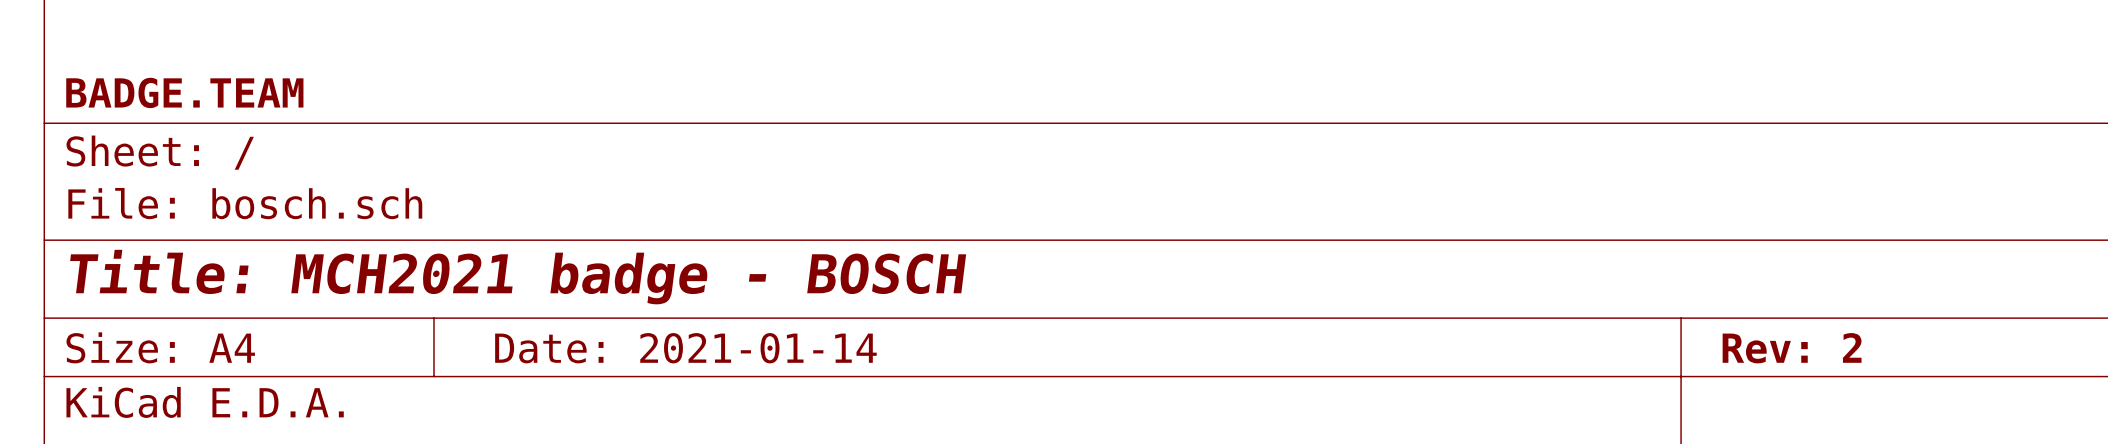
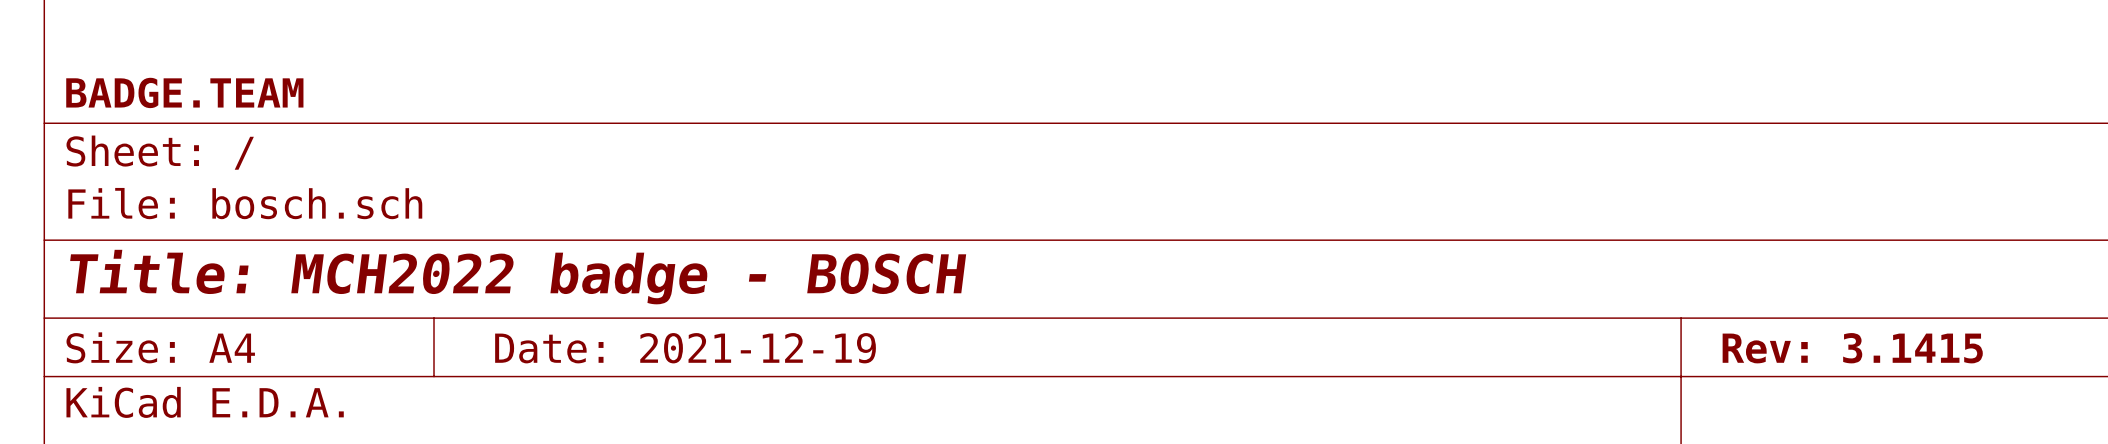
title block: Title: MCH2021 badge - BOSCH (518, 277) -> Title: MCH2022 badge - BOSCH (518, 277)
title block: Date: 2021-01-14 (685, 348) -> Date: 2021-12-19 (685, 348)
title block: Rev: 2 (1792, 348) -> Rev: 3.1415 (1852, 348)

